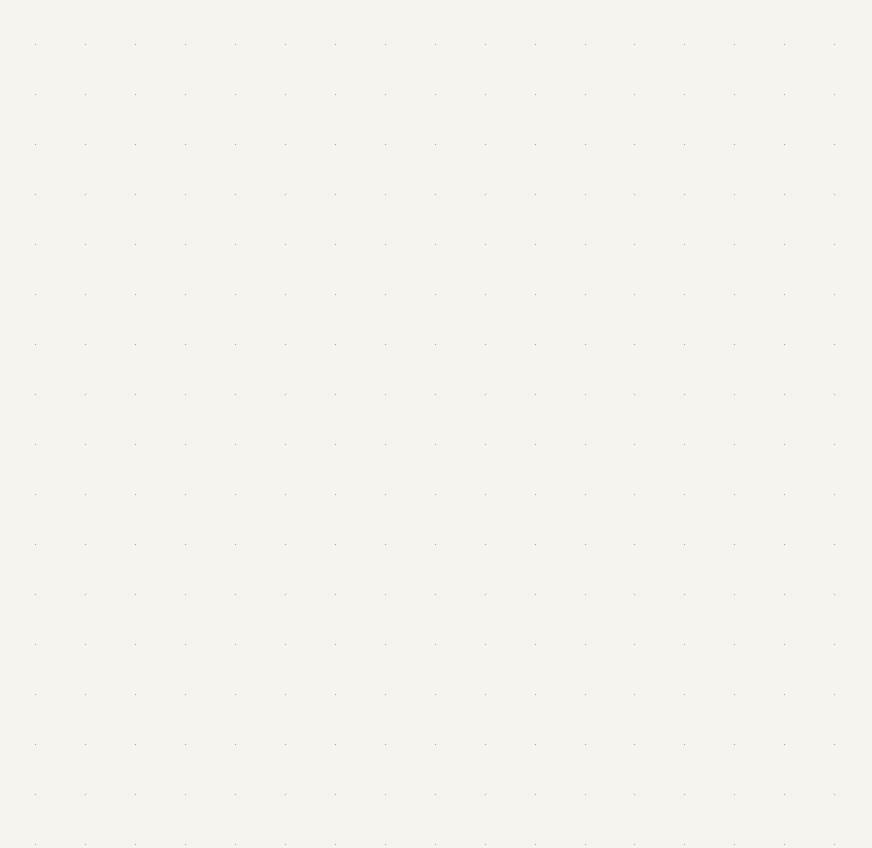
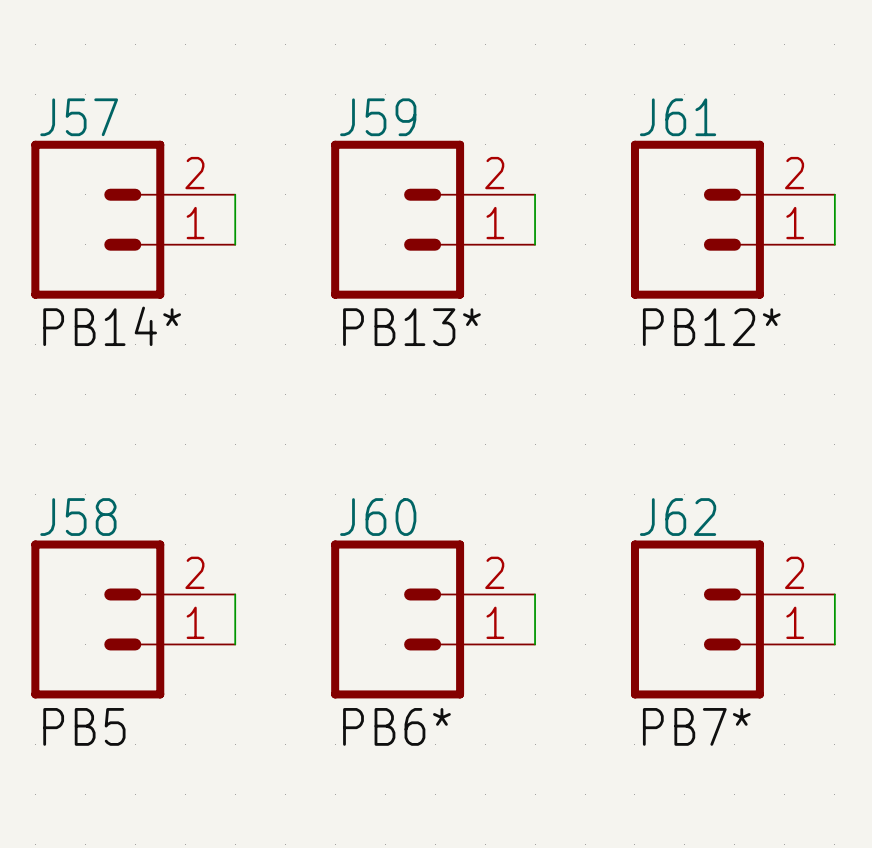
wire: none -> (235, 194) (235, 244)
wire: none -> (535, 194) (535, 244)
wire: none -> (834, 194) (834, 244)
J57: none -> (133, 219)
J59: none -> (433, 219)
J61: none -> (732, 219)
label: none -> PB14* (112, 326)
label: none -> PB13* (411, 327)
label: none -> PB12* (711, 327)
wire: none -> (235, 594) (235, 644)
wire: none -> (535, 594) (535, 644)
wire: none -> (834, 594) (834, 644)
J58: none -> (133, 619)
J60: none -> (433, 619)
J62: none -> (732, 619)
label: none -> PB5 (84, 726)
label: none -> PB6* (396, 726)
label: none -> PB7* (696, 726)

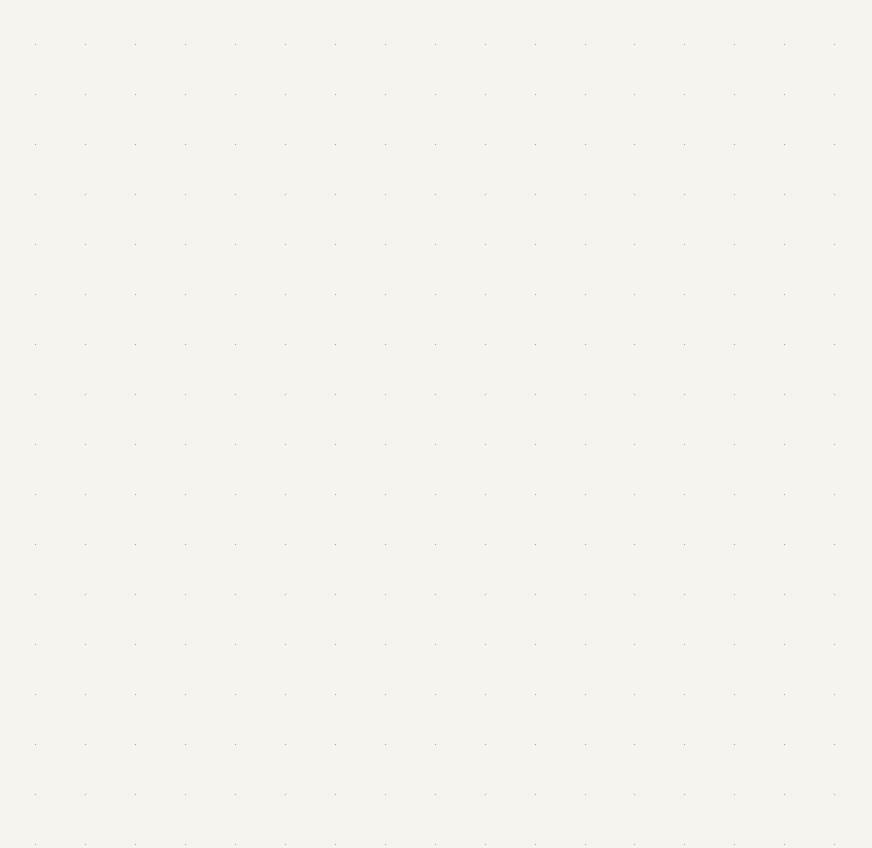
wire: (235, 194) (235, 244) -> none
wire: (535, 194) (535, 244) -> none
wire: (834, 194) (834, 244) -> none
J57: (133, 219) -> none
J59: (433, 219) -> none
J61: (732, 219) -> none
label: PB14* (112, 326) -> none
label: PB13* (411, 327) -> none
label: PB12* (711, 327) -> none
wire: (235, 594) (235, 644) -> none
wire: (535, 594) (535, 644) -> none
wire: (834, 594) (834, 644) -> none
J58: (133, 619) -> none
J60: (433, 619) -> none
J62: (732, 619) -> none
label: PB5 (84, 726) -> none
label: PB6* (396, 726) -> none
label: PB7* (696, 726) -> none

